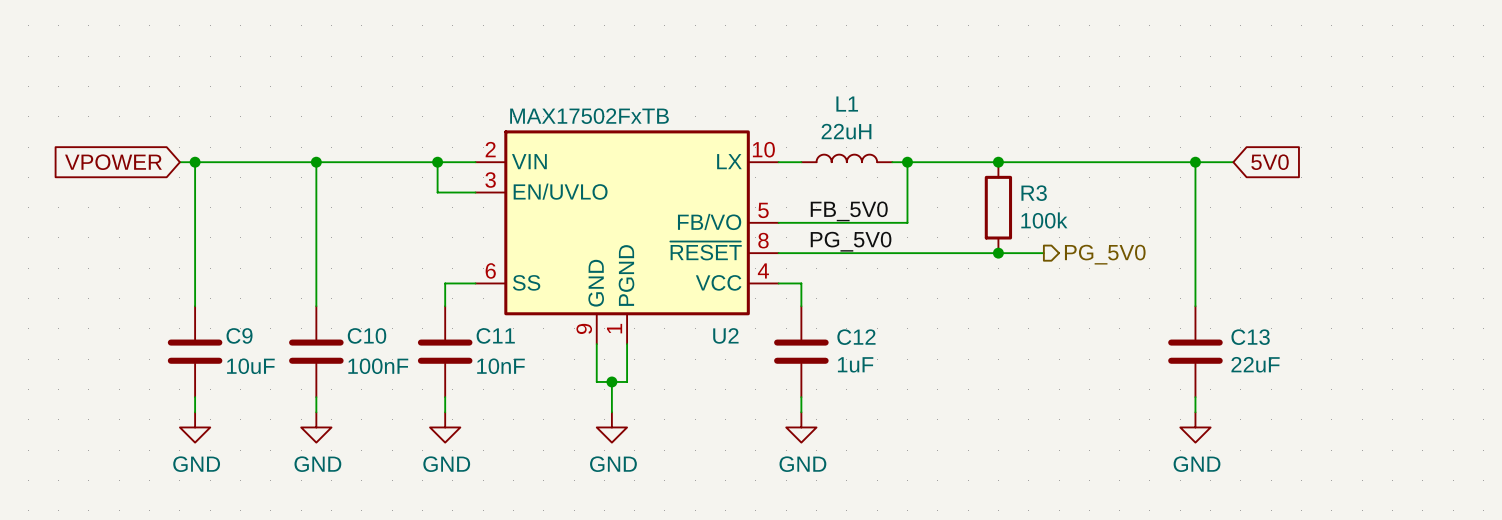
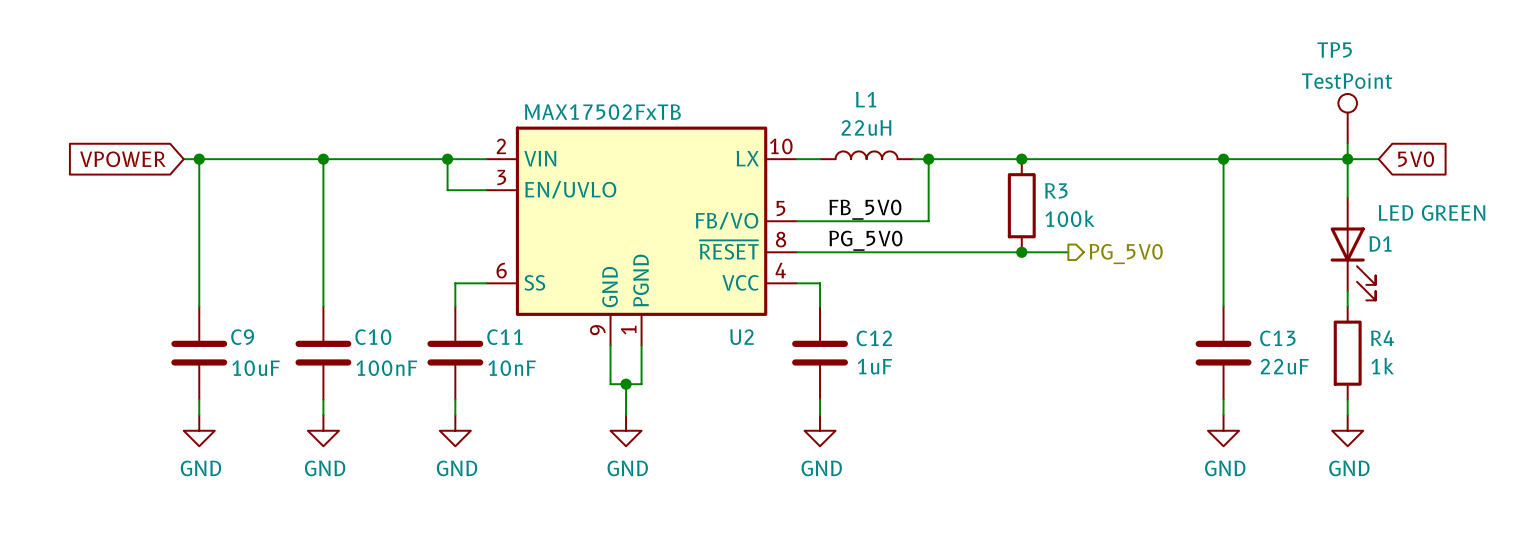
TP5: none -> TestPoint (1347, 118)
wire: none -> (1347, 143) (1347, 197)
wire: none -> (1262, 159) (1378, 159)
global label position: 5V0 (1270, 162) -> 5V0 (1416, 159)
junction: none -> (1347, 159)
D1: none -> LED GREEN (1353, 249)
wire: none -> (1347, 291) (1347, 306)
R4: none -> 1k (1347, 353)
wire: none -> (1347, 399) (1347, 415)
power symbol: none -> GND (1347, 430)

